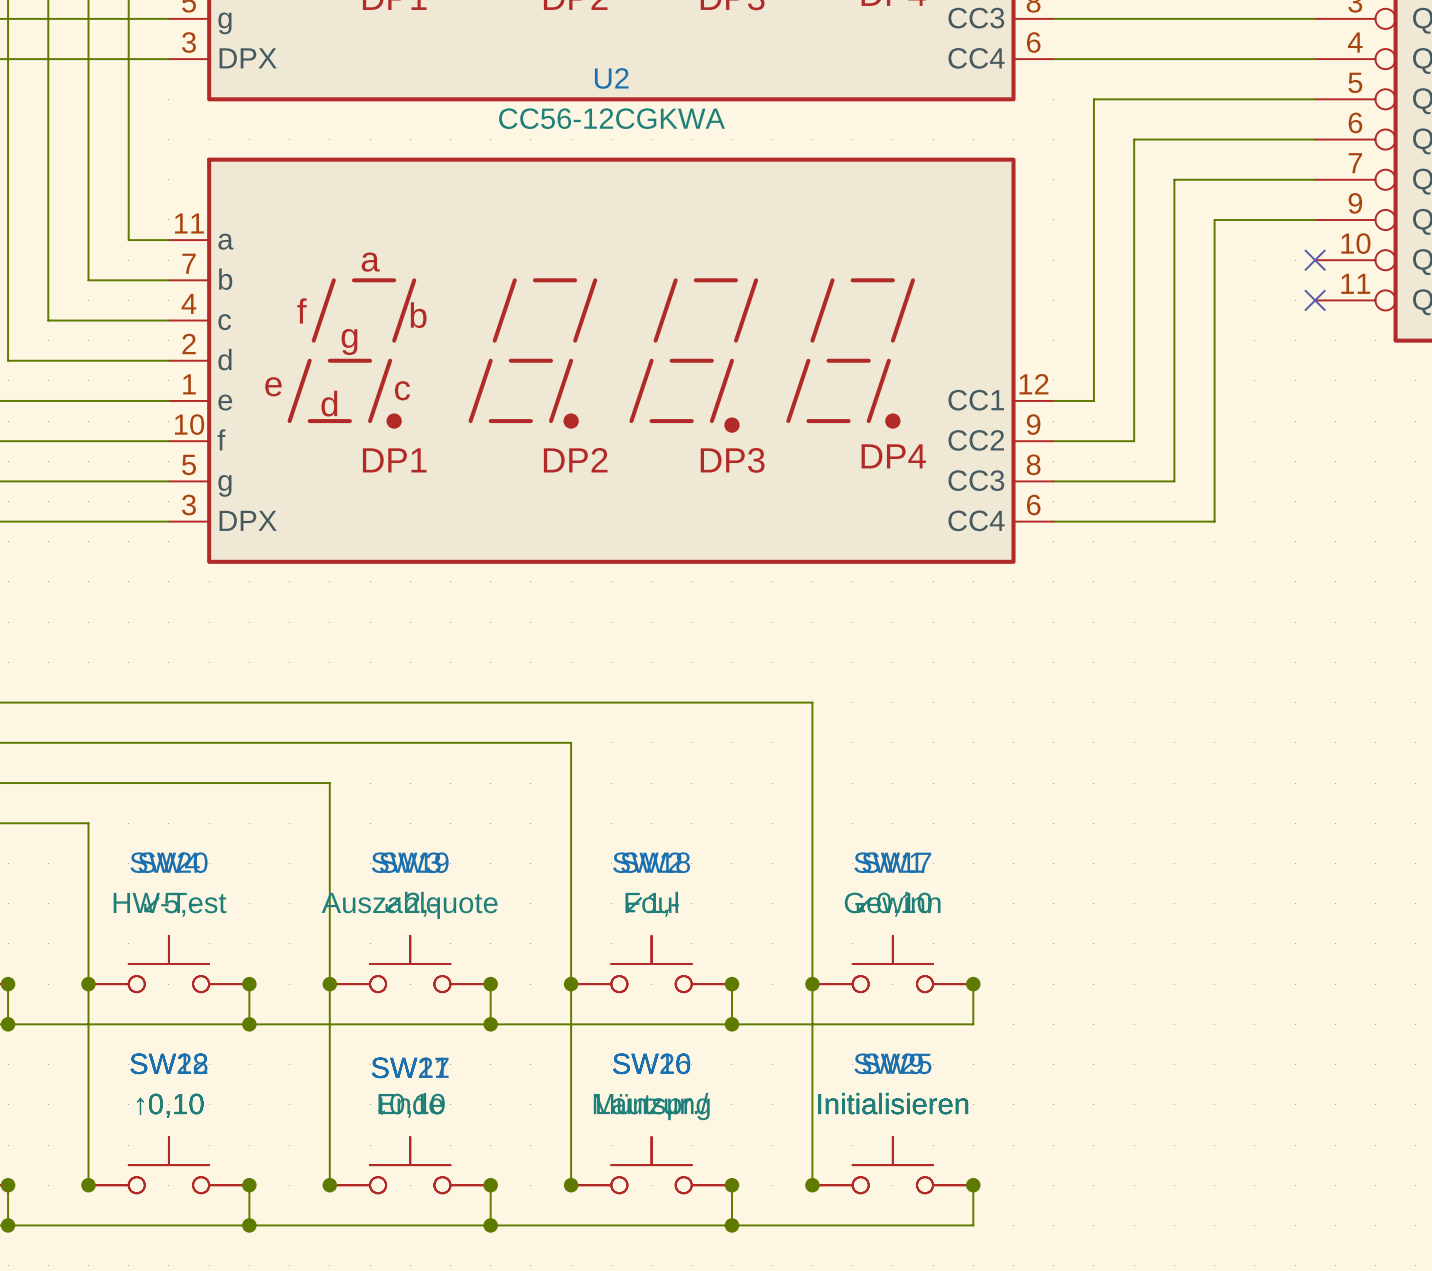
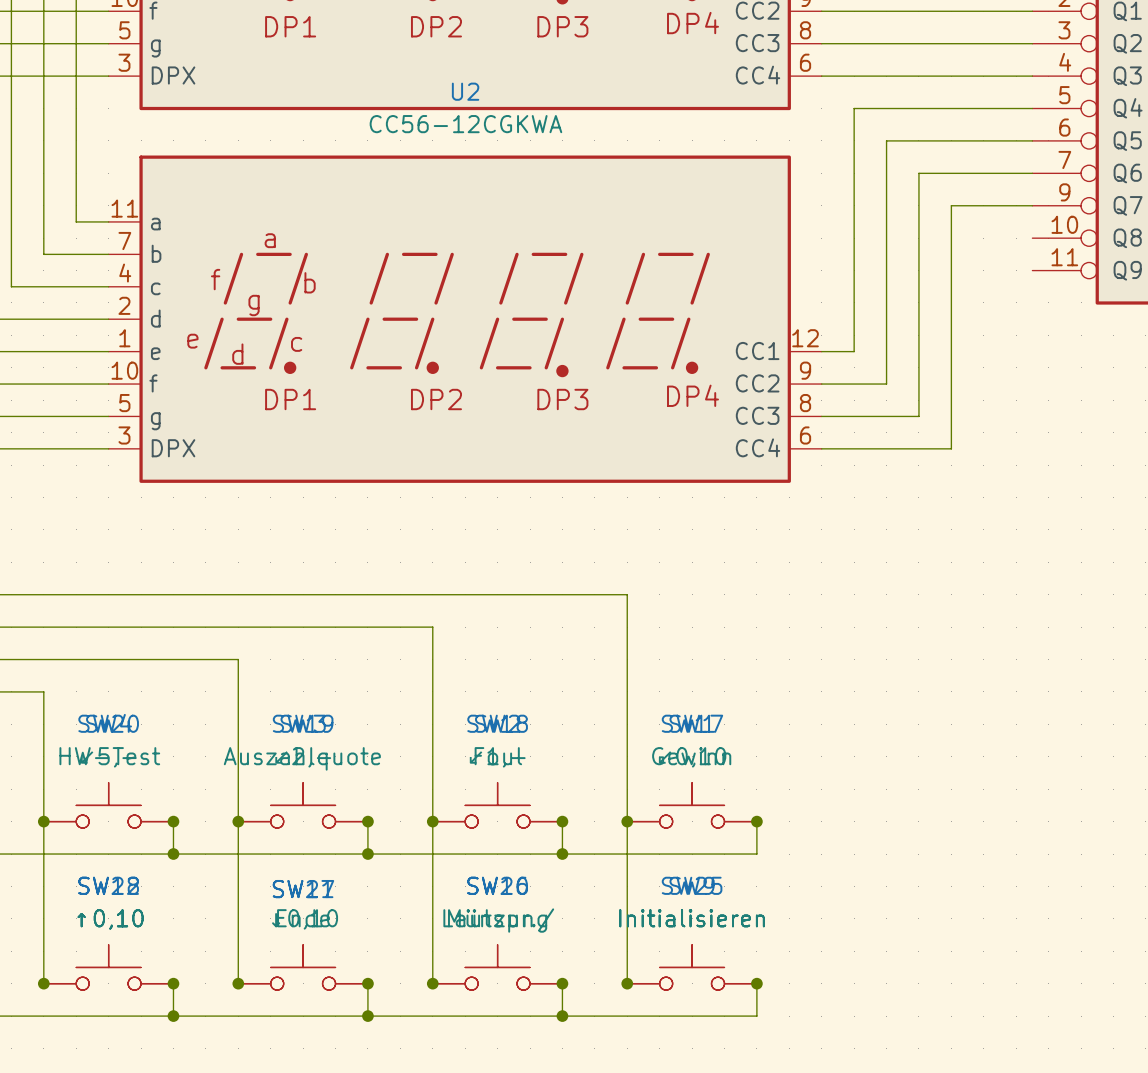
no-connect mark: (1315, 260) -> none
no-connect mark: (1315, 300) -> none

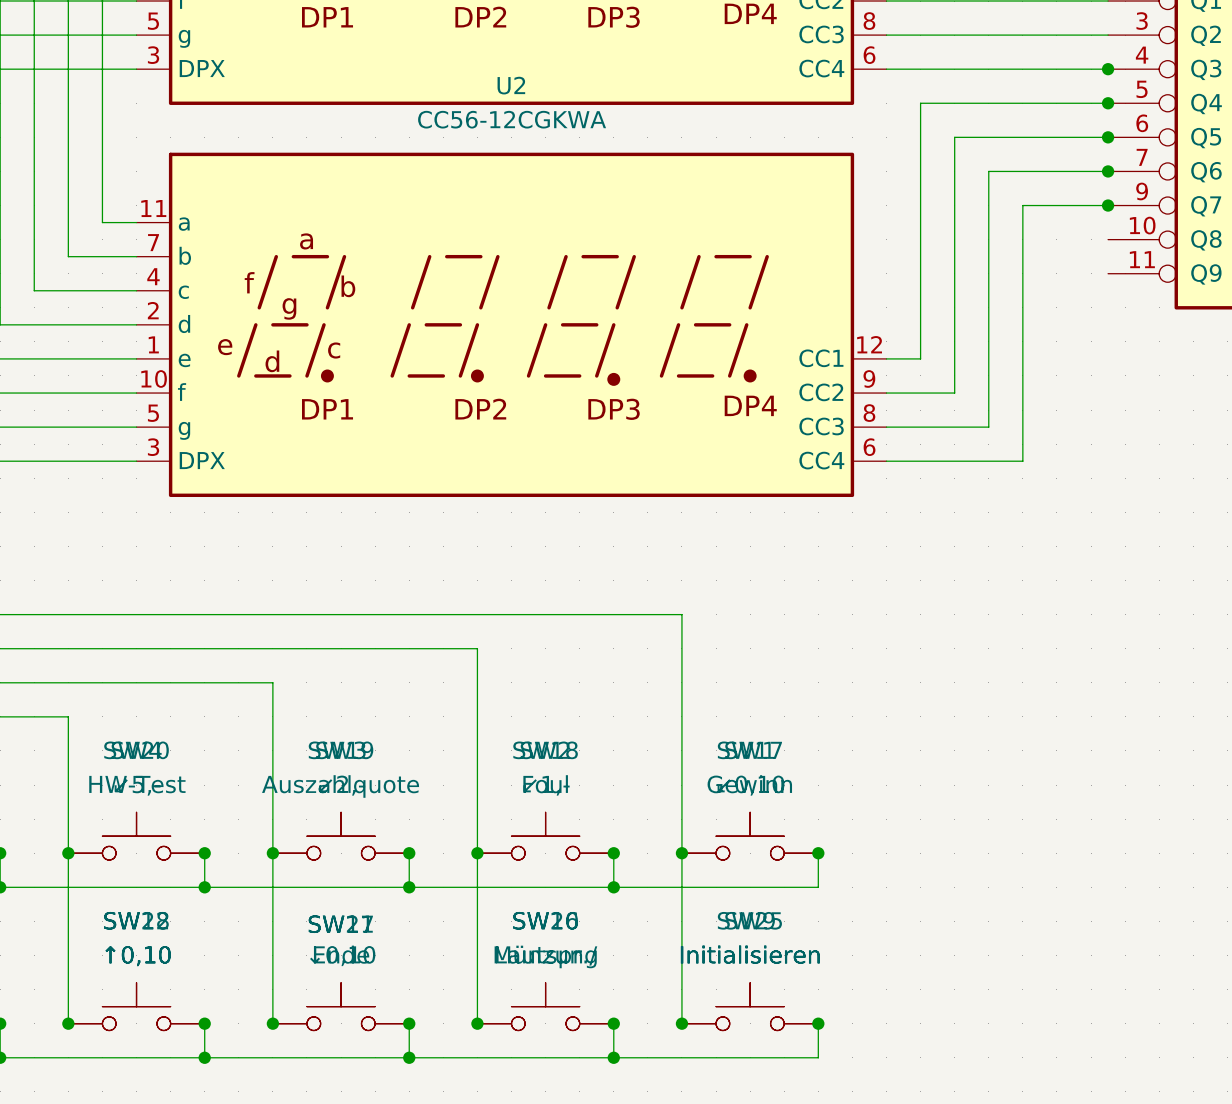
junction: none -> (1108, 69)
junction: none -> (1108, 103)
junction: none -> (1108, 137)
junction: none -> (1108, 171)
junction: none -> (1108, 205)

